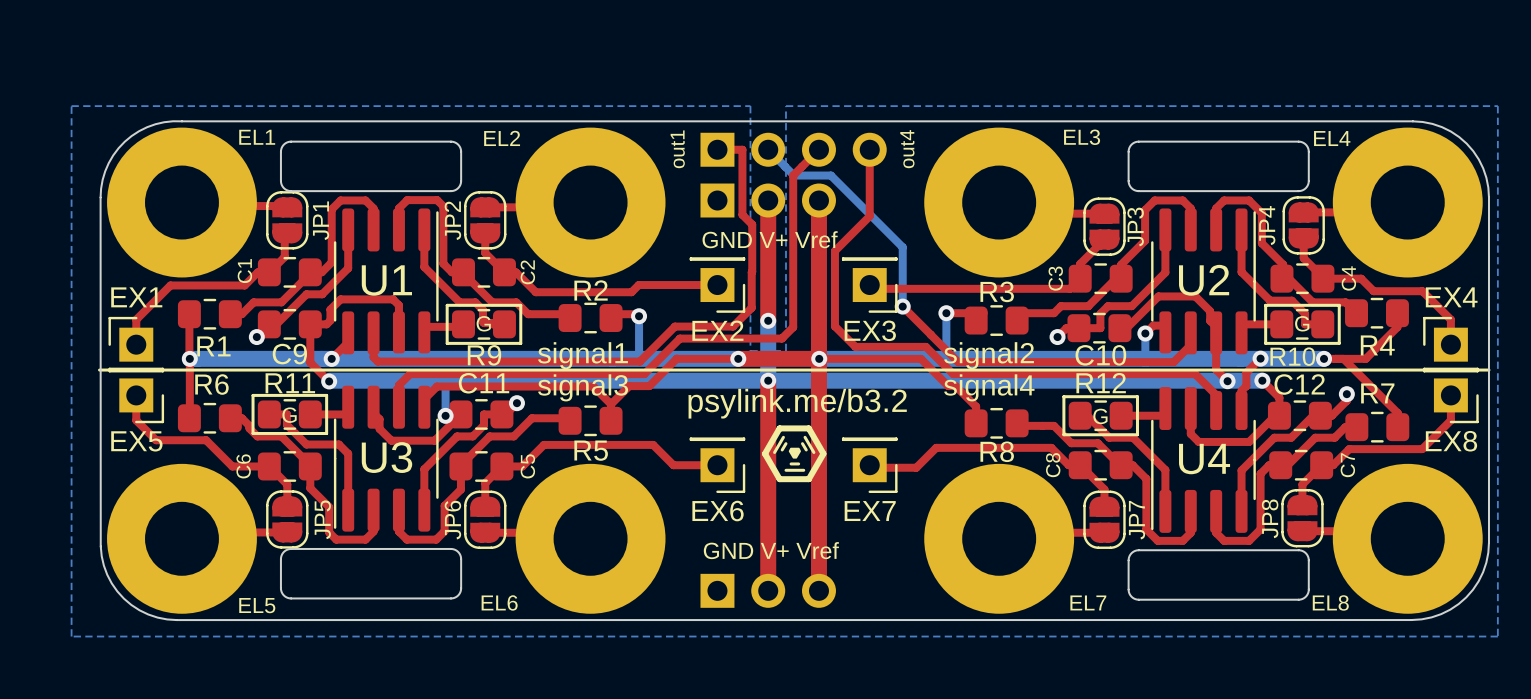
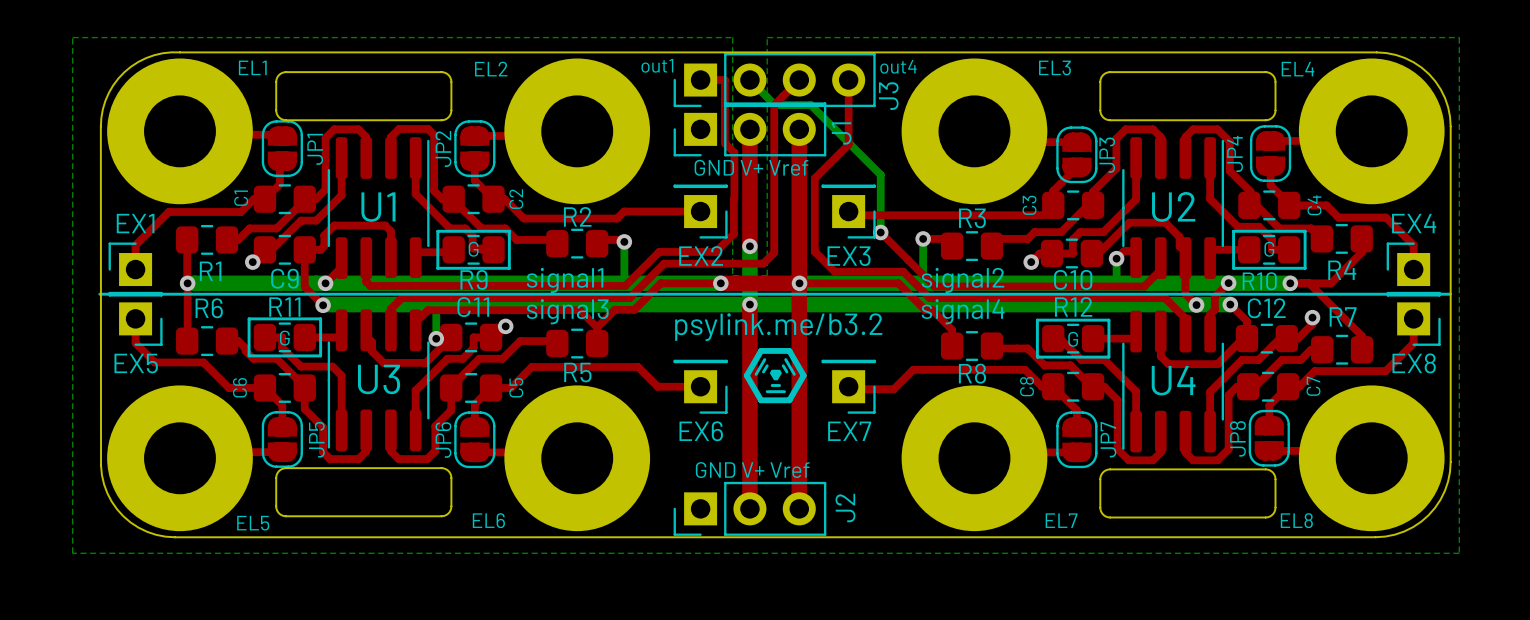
text rotation: 0° (677, 149) -> 90° clockwise (657, 65)
J3 side: bottom (793, 149) -> top (774, 80)
text rotation: 0° (907, 149) -> 90° clockwise (898, 66)
J1 side: bottom (768, 200) -> top (749, 129)
J2 side: bottom (768, 590) -> top (749, 508)

